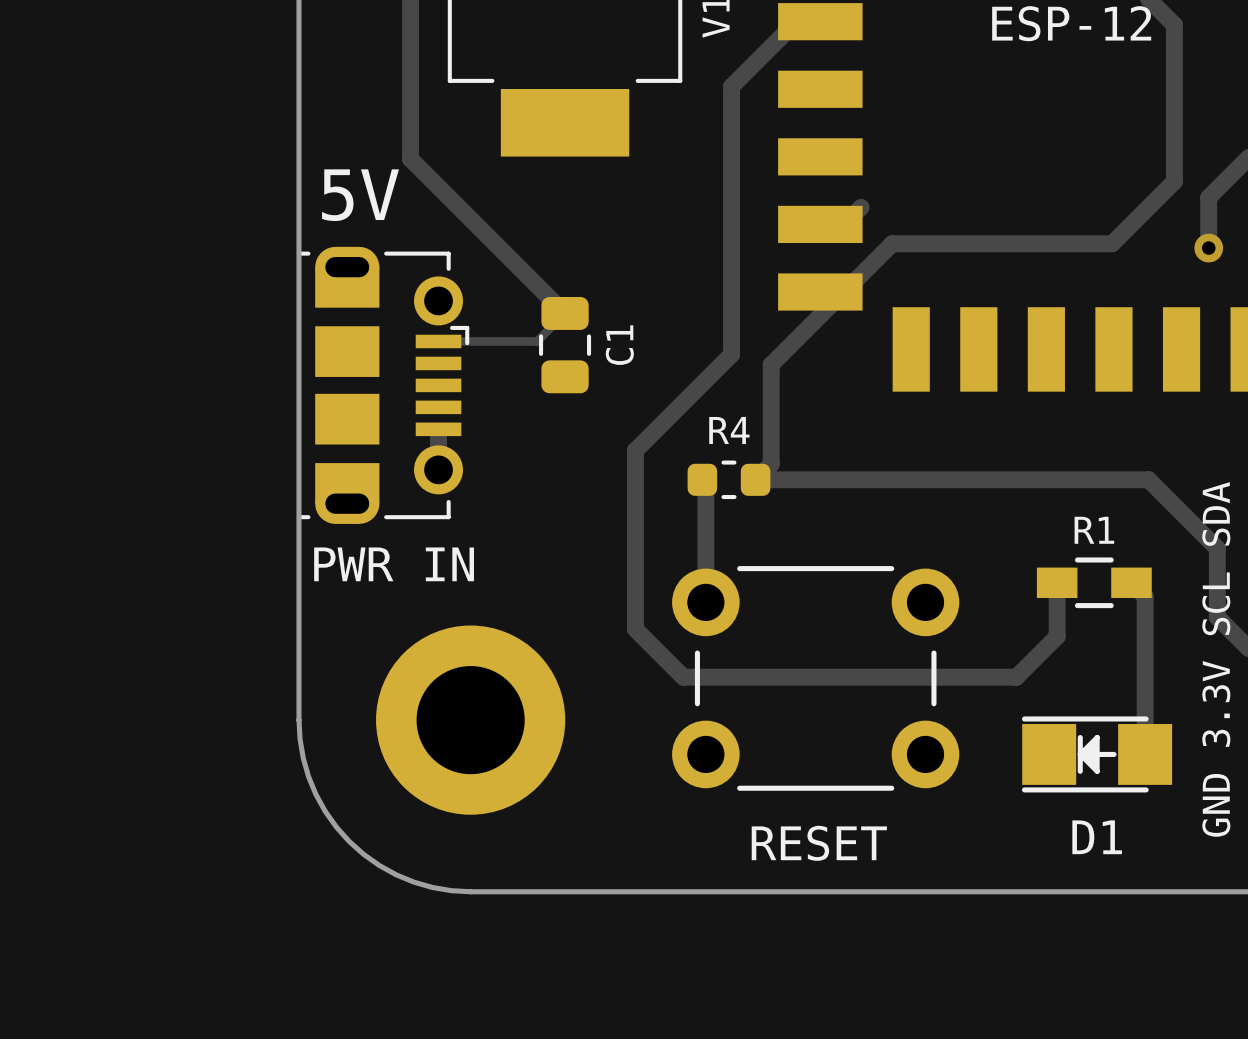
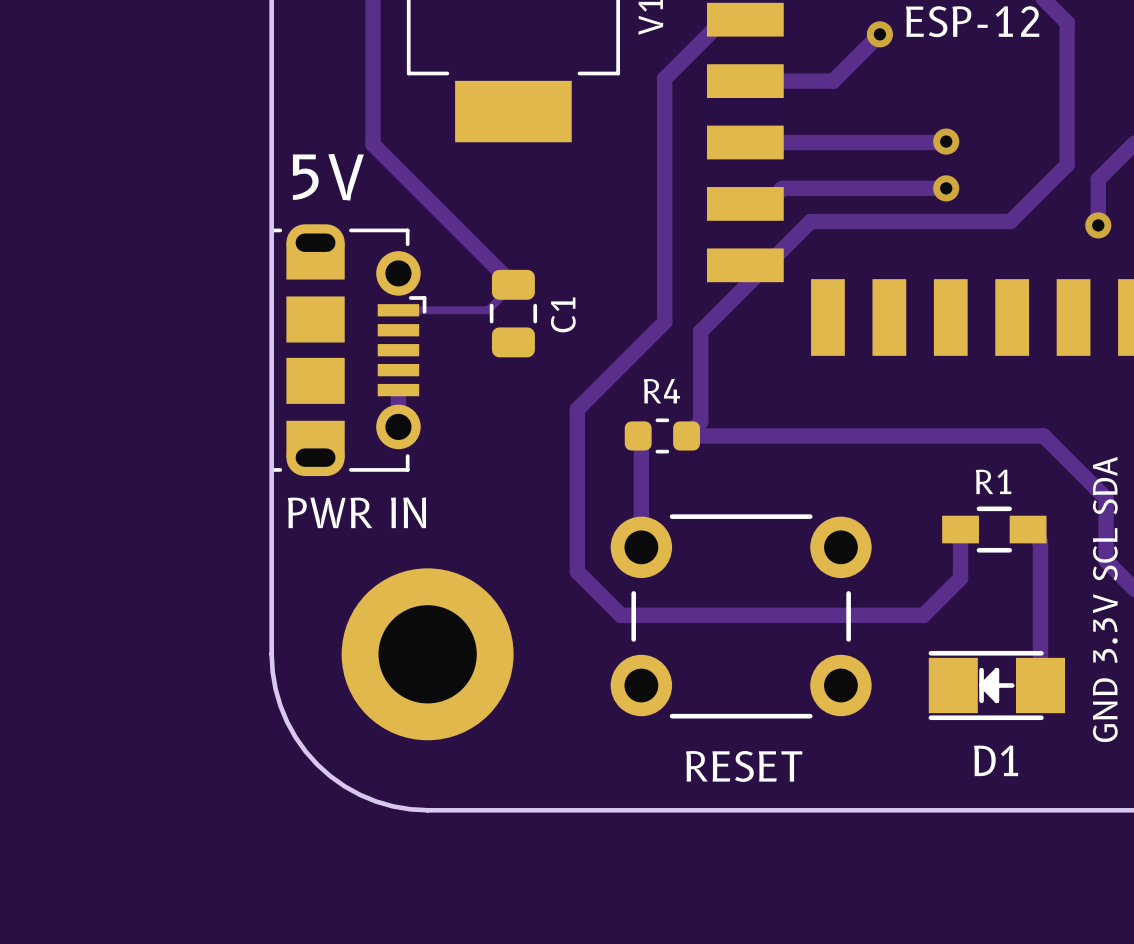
track: none -> (879, 34) (833, 81) (766, 81)
via: none -> (879, 34)
track: none -> (946, 141) (766, 142)
via: none -> (946, 141)
track: none -> (782, 188) (946, 188)
via: none -> (946, 188)

